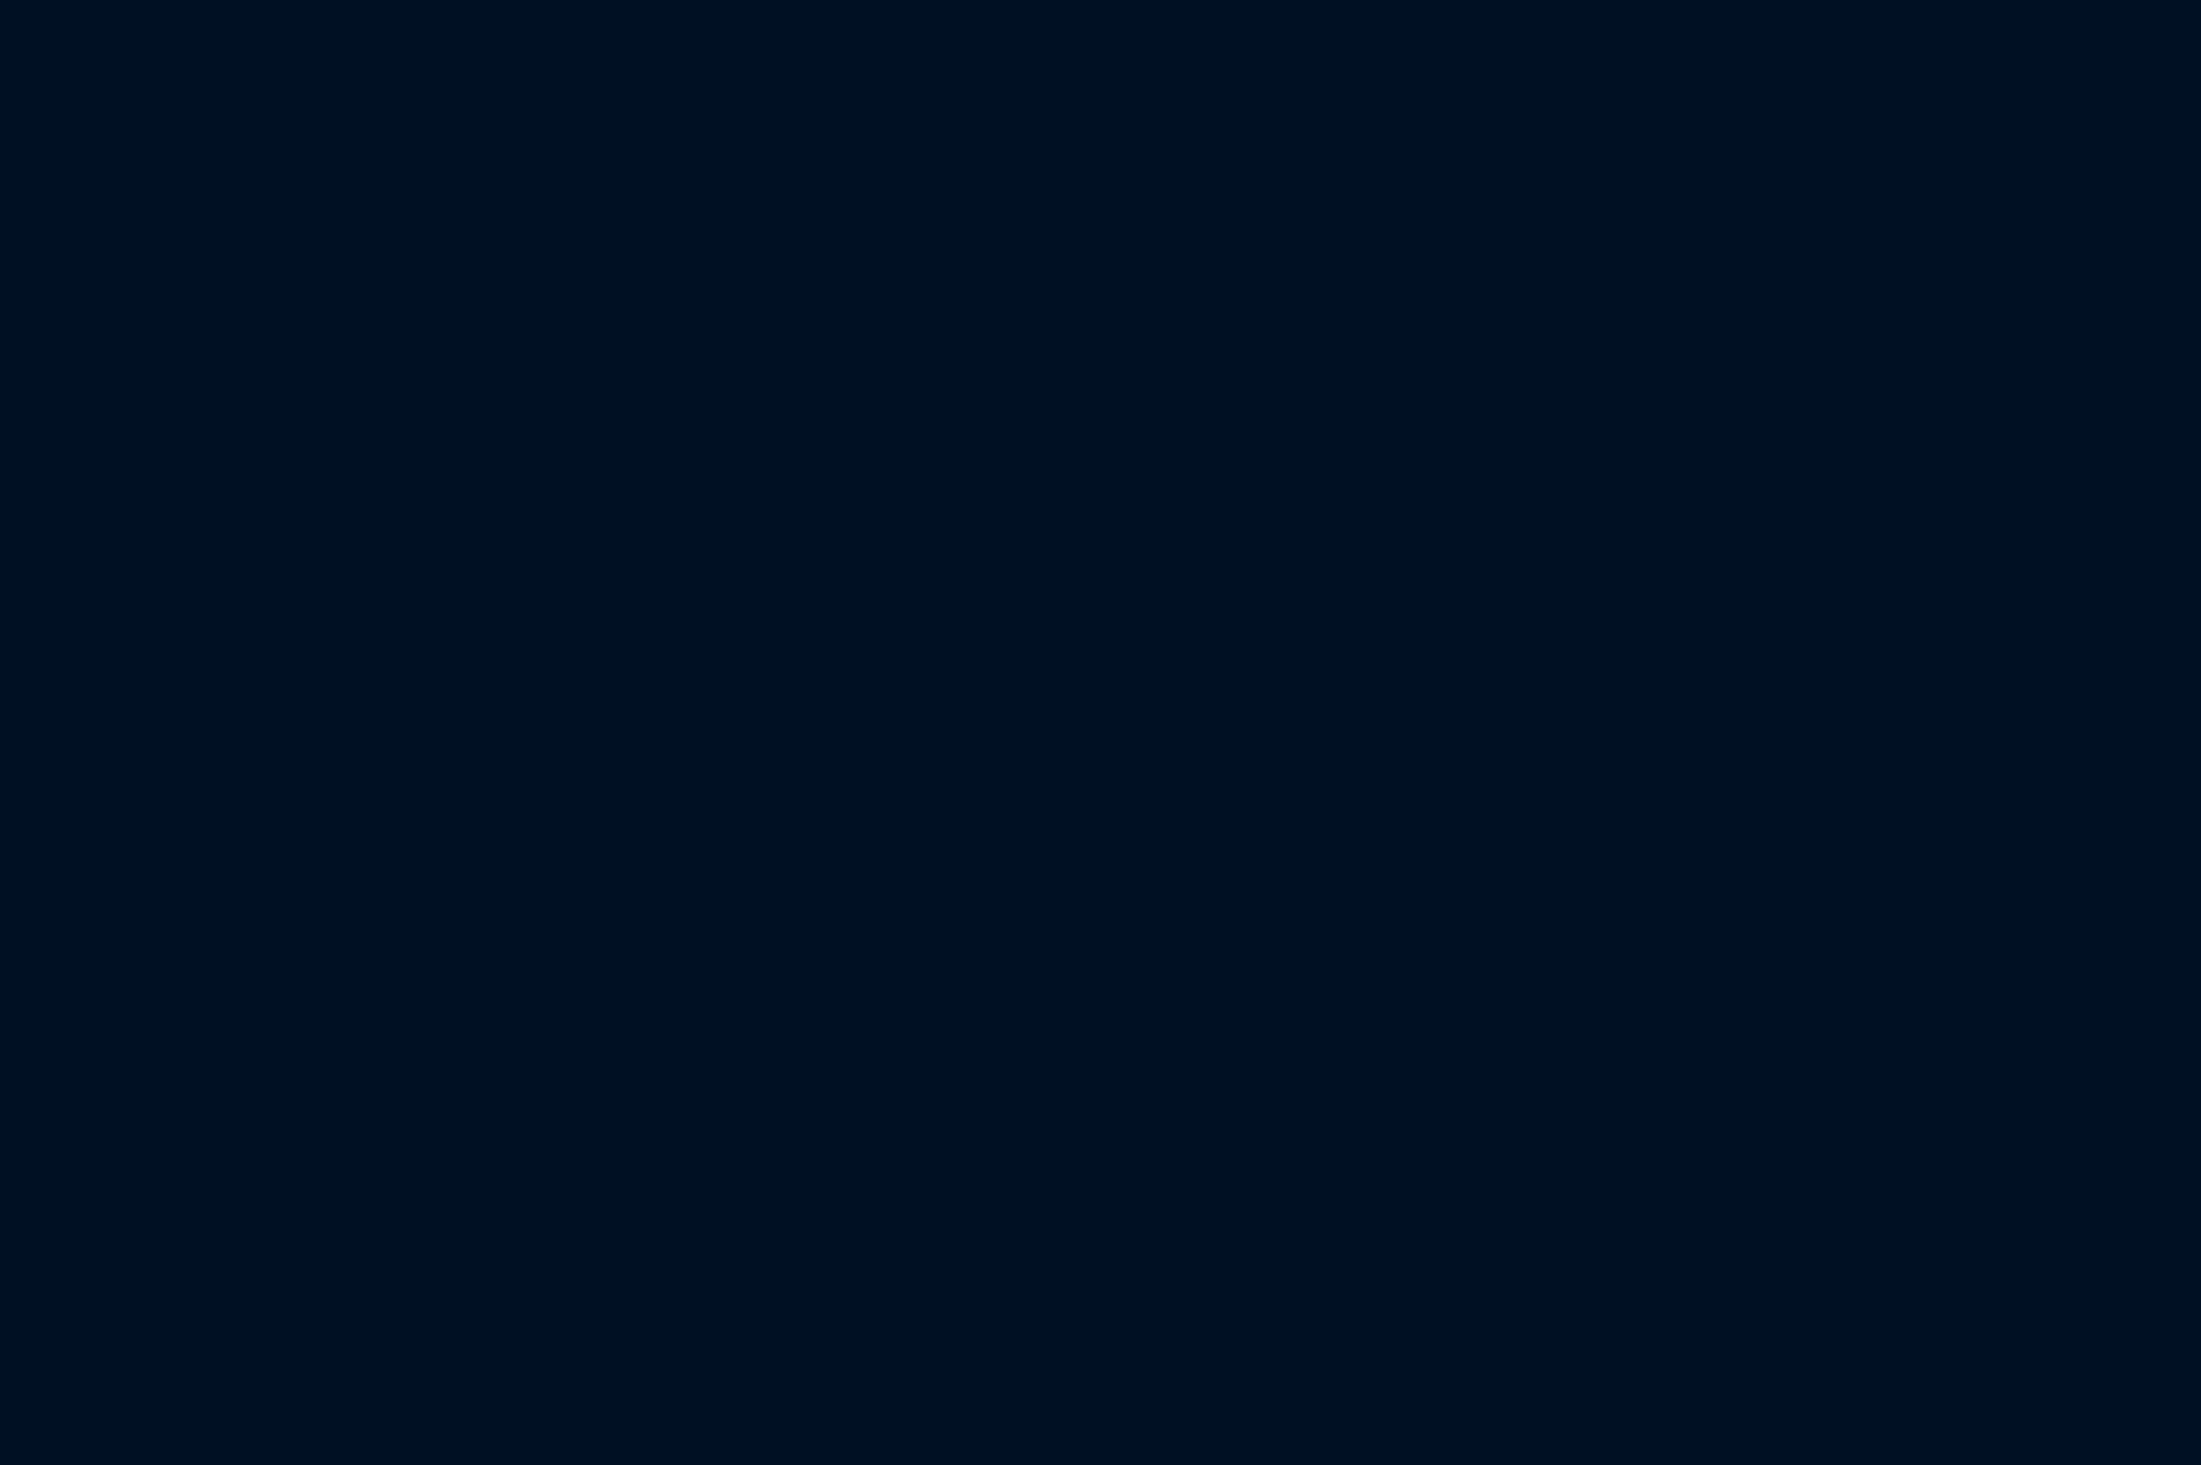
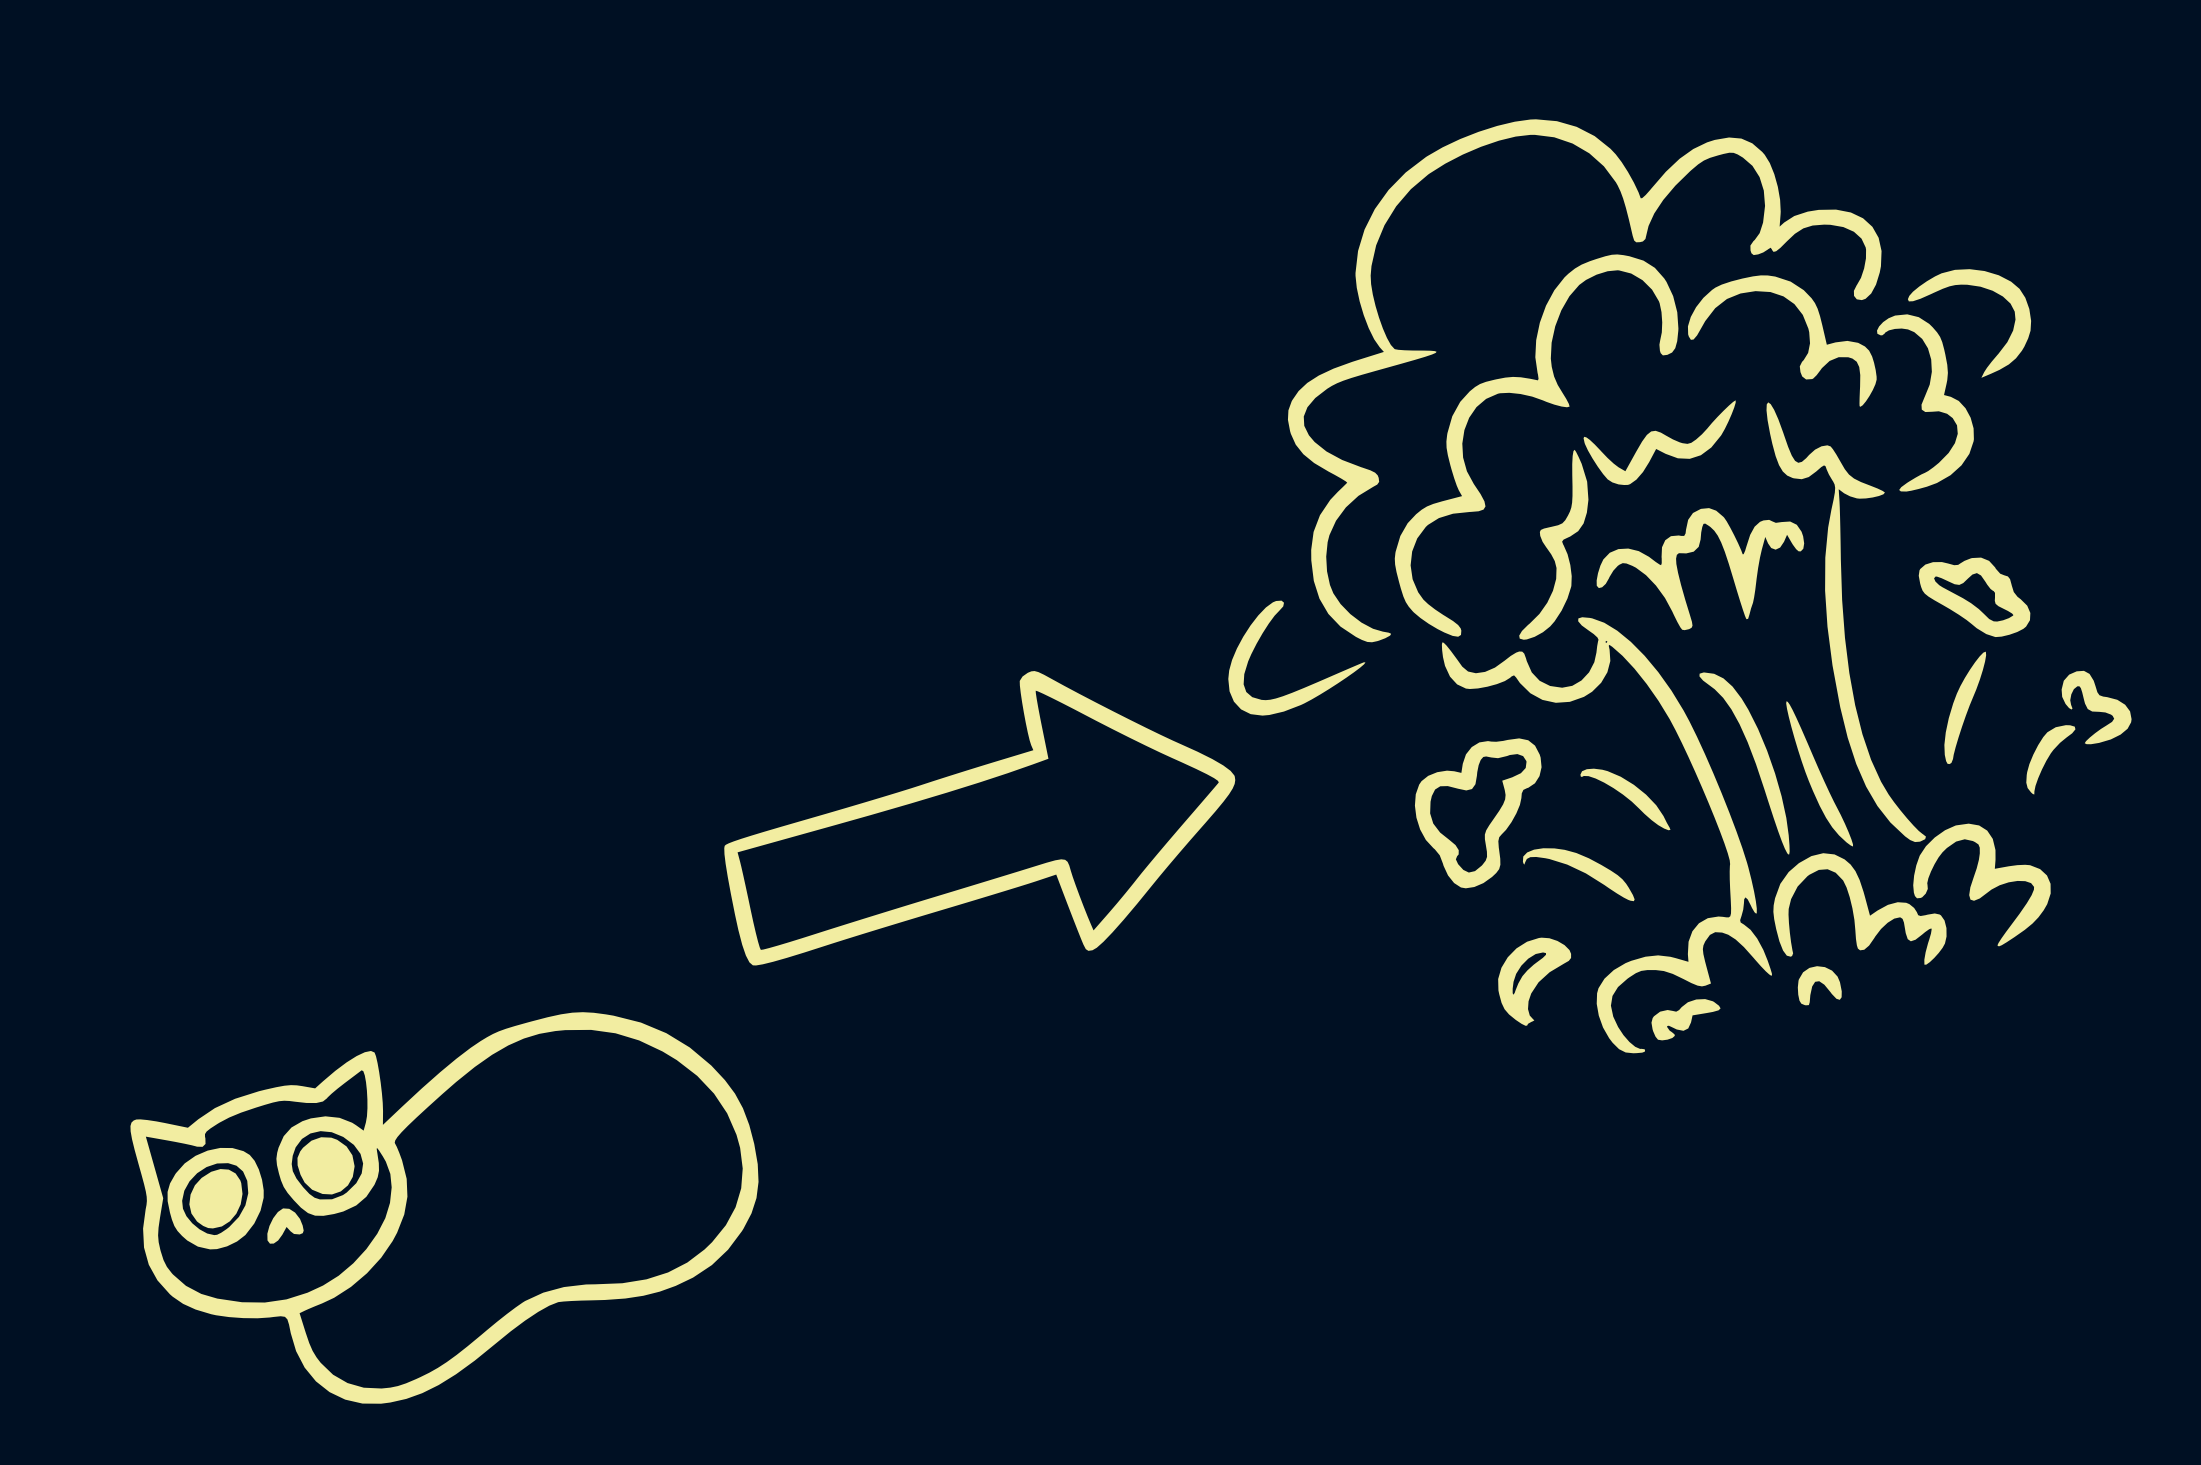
drawing: none -> [130, 119, 2132, 1404]

